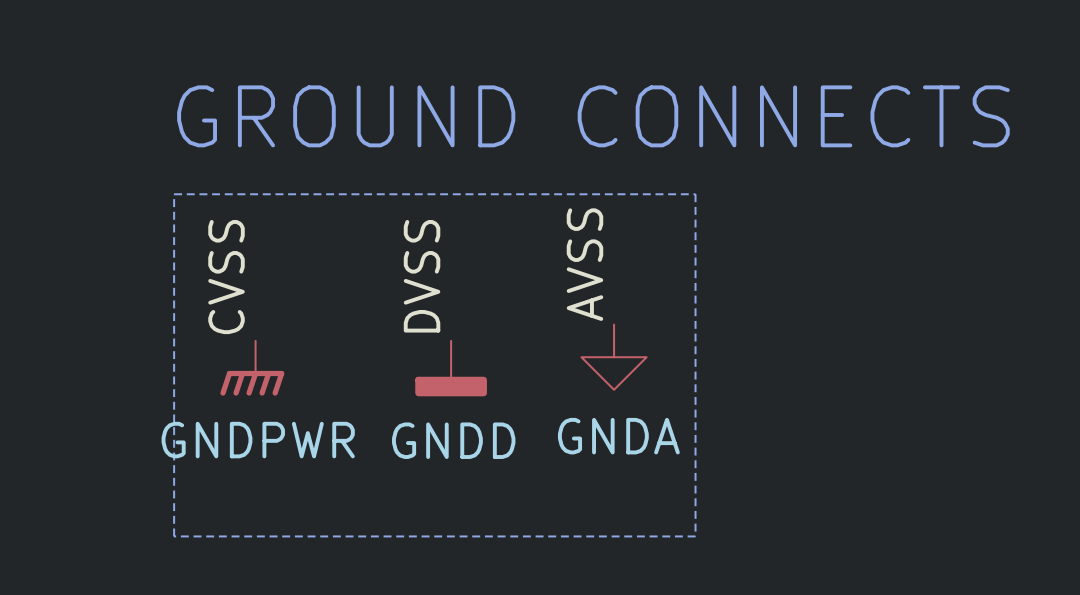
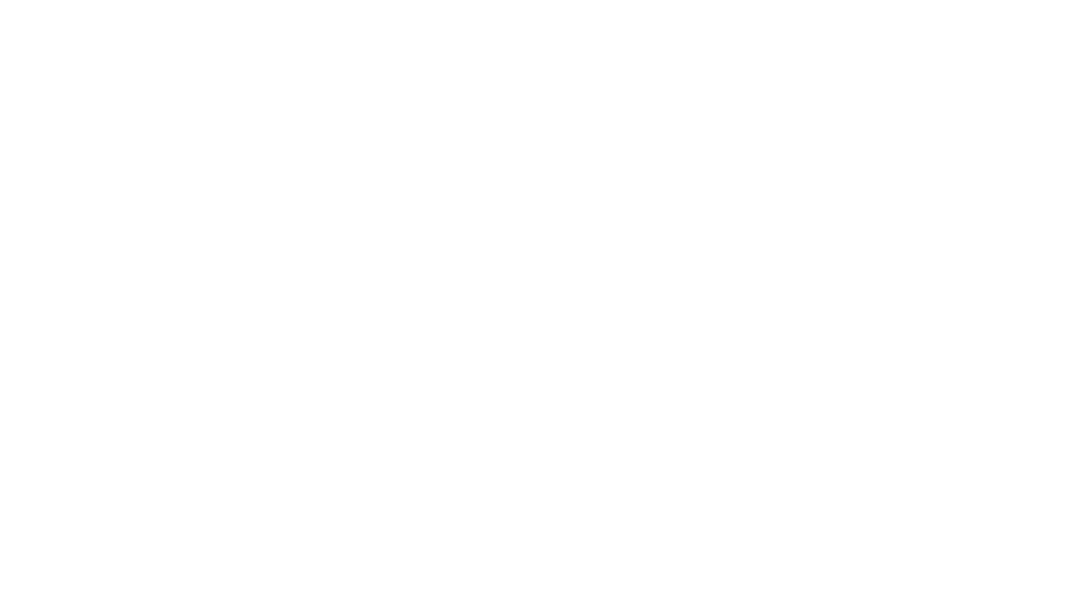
text: GROUND CONNECTS (593, 116) -> none
line: (174, 194) (695, 194) (695, 536) (174, 536) (174, 194) -> none
label: AVSS (584, 264) -> none
label: DVSS (422, 276) -> none
label: CVSS (226, 277) -> none
power symbol: GNDA (614, 357) -> none
power symbol: GNDPWR (252, 368) -> none
power symbol: GNDD (451, 368) -> none

